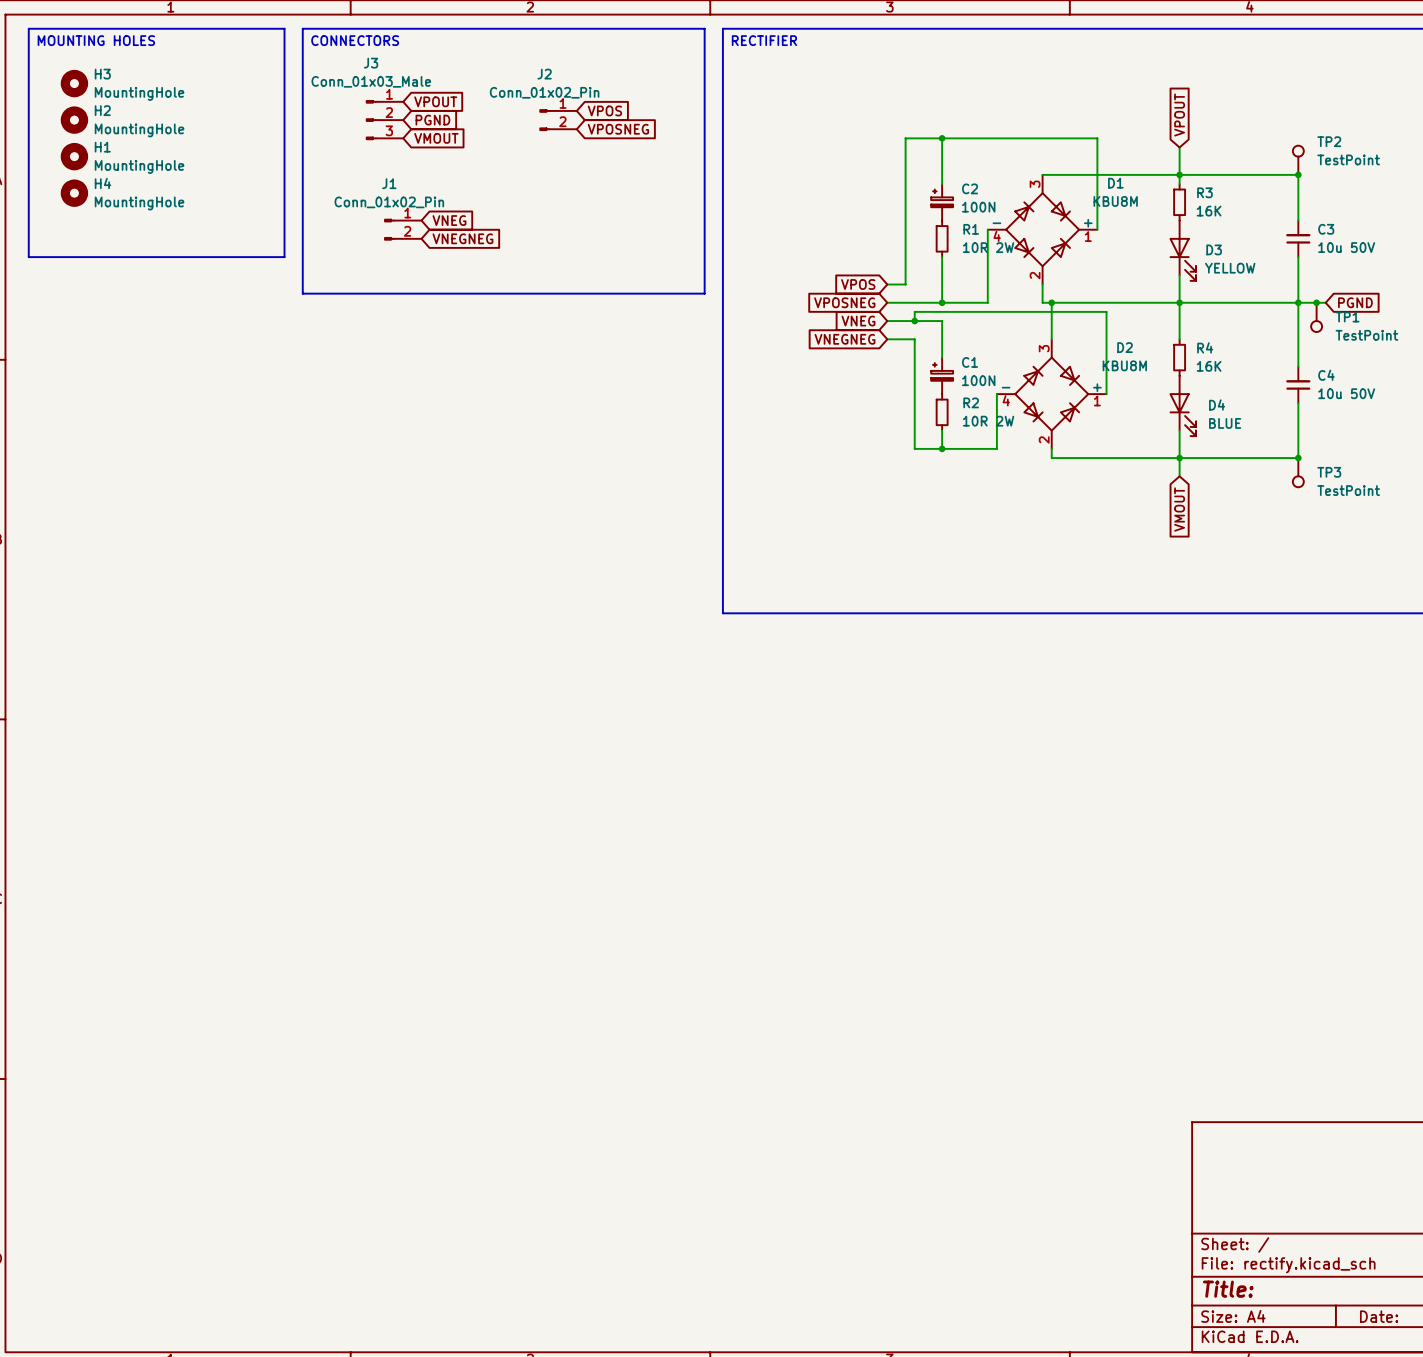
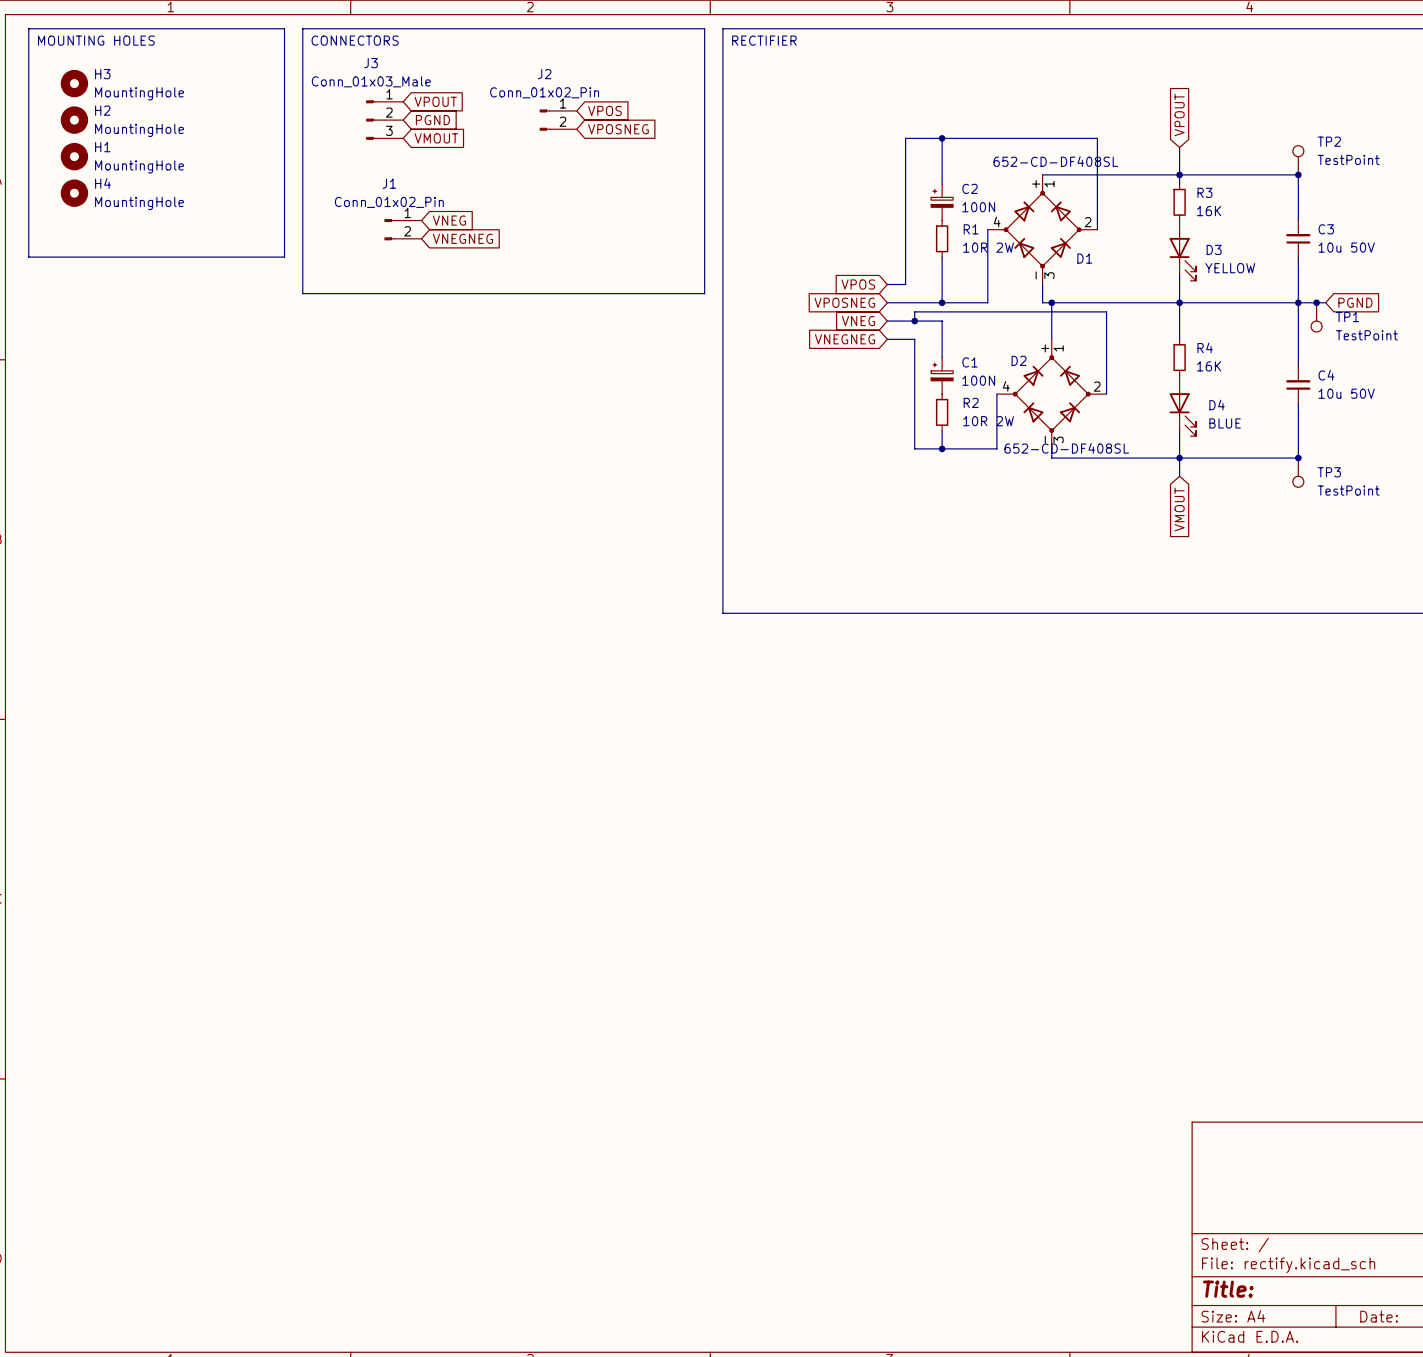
D1 symbol: [987, 174, 1098, 285] -> [987, 174, 1098, 285]
D1 name position: D1 (1115, 183) -> D1 (1084, 258)
D1 value: KBU8M (1115, 201) -> 652-CD-DF408SL (1055, 161)
D2 symbol: [996, 339, 1107, 449] -> [996, 339, 1107, 449]
D2 name position: D2 (1125, 347) -> D2 (1019, 360)
D2 value: KBU8M (1124, 365) -> 652-CD-DF408SL (1066, 448)

